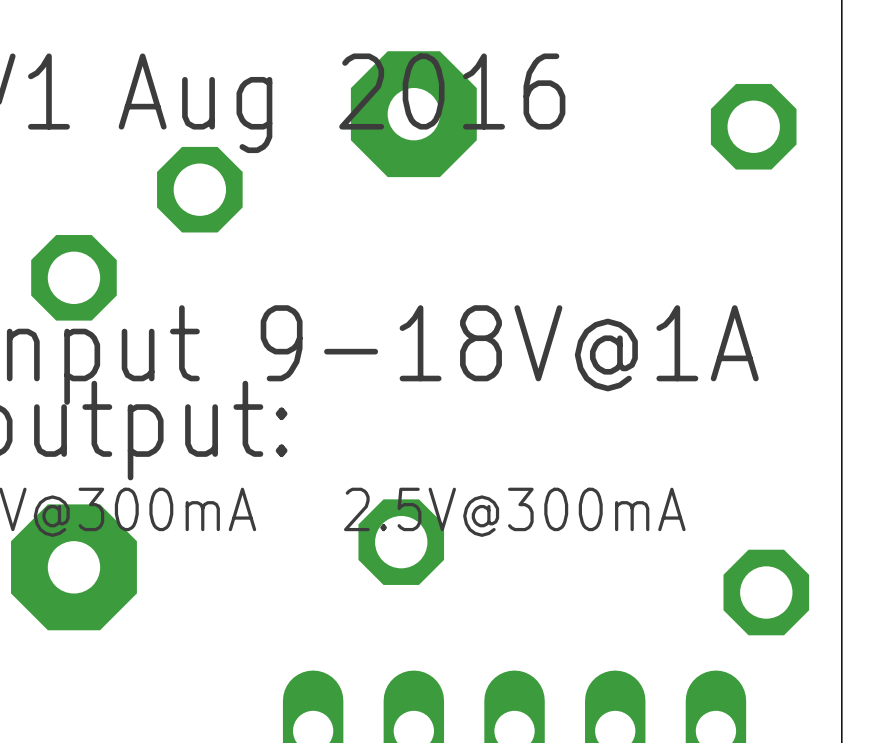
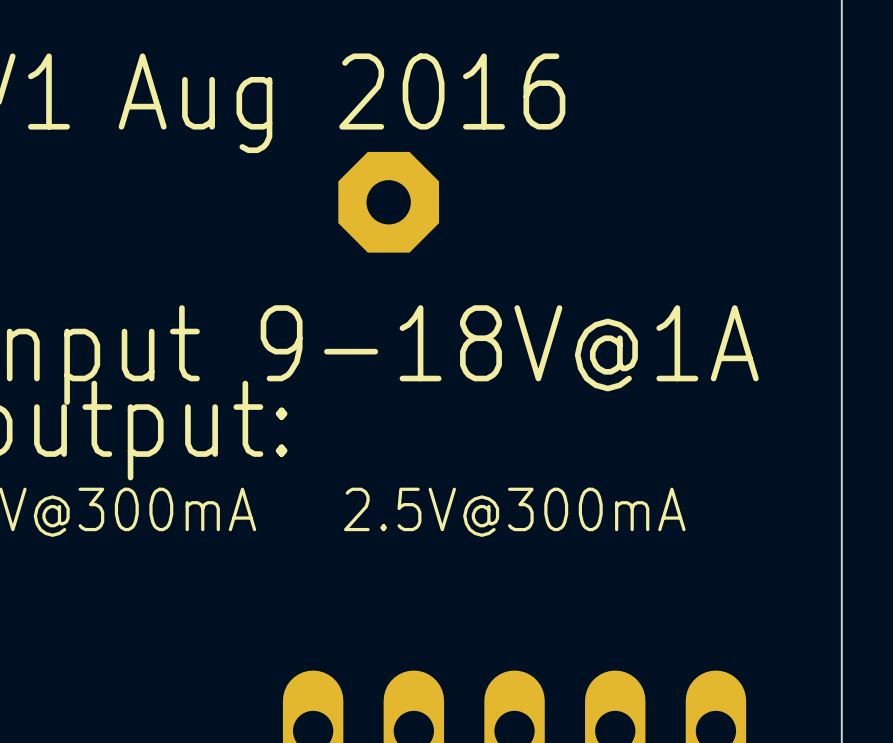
part: (413, 114) -> none
part: (753, 126) -> none
part: (199, 189) -> none
part: none -> (388, 202)
part: (73, 277) -> none
part: (401, 542) -> none
part: (73, 567) -> none
part: (766, 592) -> none

